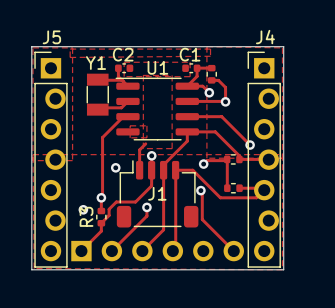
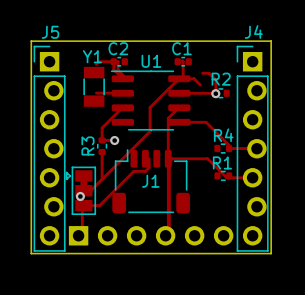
zone outline: (32, 47) (32, 160) (72, 160) (72, 47) (32, 47) -> none
zone outline: (70, 49) (70, 57) (210, 56) (210, 49) (70, 49) -> none
zone outline: (124, 62) (124, 76) (190, 76) (190, 62) (124, 62) -> none
track: none -> (182, 60) (183, 78)
track: (197, 68) (197, 76) (187, 86) -> (83, 190) (90, 190) (150, 131) (150, 107) (179, 78)
track: (197, 68) (211, 68) -> none
track: none -> (96, 64) (99, 61) (118, 61) (118, 70) (126, 78)
part: (211, 74) -> none
zone outline: (143, 75) (143, 148) (172, 148) (172, 75) (143, 75) -> none
track: (97, 79) (121, 80) -> none
via: (209, 92) -> none
track: none -> (96, 93) (126, 93)
track: (127, 101) (121, 107) (99, 107) (97, 109) -> none
R2: none -> (220, 93)
track: (127, 116) (123, 116) (102, 137) (101, 211) -> (122, 107) (102, 127) (102, 140) (114, 140)
track: none -> (179, 107) (168, 118) (168, 155) (172, 158) (169, 161) (169, 235)
track: (191, 116) (221, 116) (250, 145) -> none
zone outline: (130, 125) (130, 137) (146, 137) (146, 125) (130, 125) -> none
track: (191, 131) (187, 131) (187, 141) (163, 164) (163, 229) (142, 251) -> none
track: (145, 143) (139, 149) (139, 170) -> none
R4 name: none -> R4 (223, 135)
via: (250, 145) -> none
via: none -> (114, 140)
zone outline: (282, 154) (32, 154) (34, 268) (282, 269) (282, 47) (206, 46) (206, 158) (282, 158) -> none
track: (151, 155) (151, 185) (135, 202) (116, 202) (109, 209) (109, 215) (101, 223) (101, 231) (81, 251) -> none
via: (151, 155) -> none
track: (227, 159) (227, 188) -> (102, 152) (102, 179)
track: (227, 159) (207, 160) (203, 164) -> none
via: (203, 164) -> none
via: (115, 167) -> none
track: none -> (149, 158) (149, 167) (145, 171) (133, 171) (99, 205) (82, 207) (82, 235)
track: (192, 170) (220, 197) (256, 197) (264, 190) (262, 188) (239, 188) -> (184, 158) (207, 158) (226, 177) (252, 177)
R1 name: none -> R1 (222, 162)
track: (200, 190) (202, 219) (233, 251) -> none
via: (200, 190) -> none
via: (101, 197) -> none
part: none -> (80, 190)
track: (146, 207) (146, 216) (111, 251) -> none
via: (146, 207) -> none
R3 position: (101, 217) -> (102, 146)

